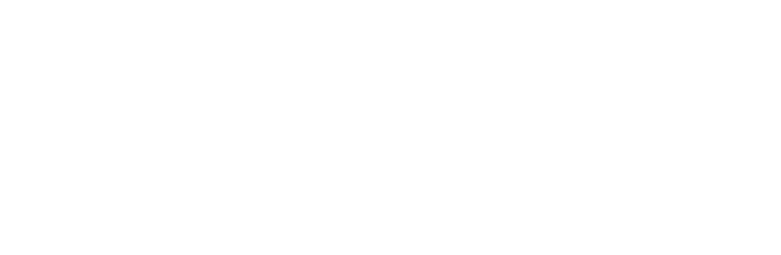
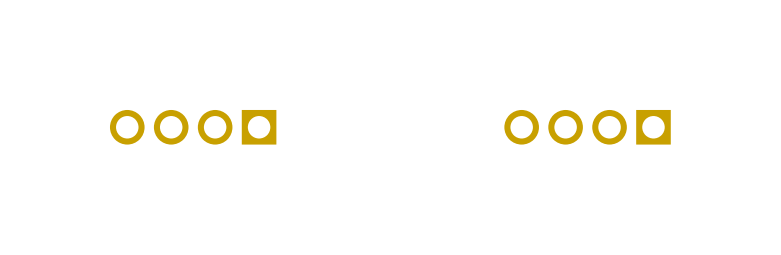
part: none -> (193, 127)
part: none -> (587, 127)

